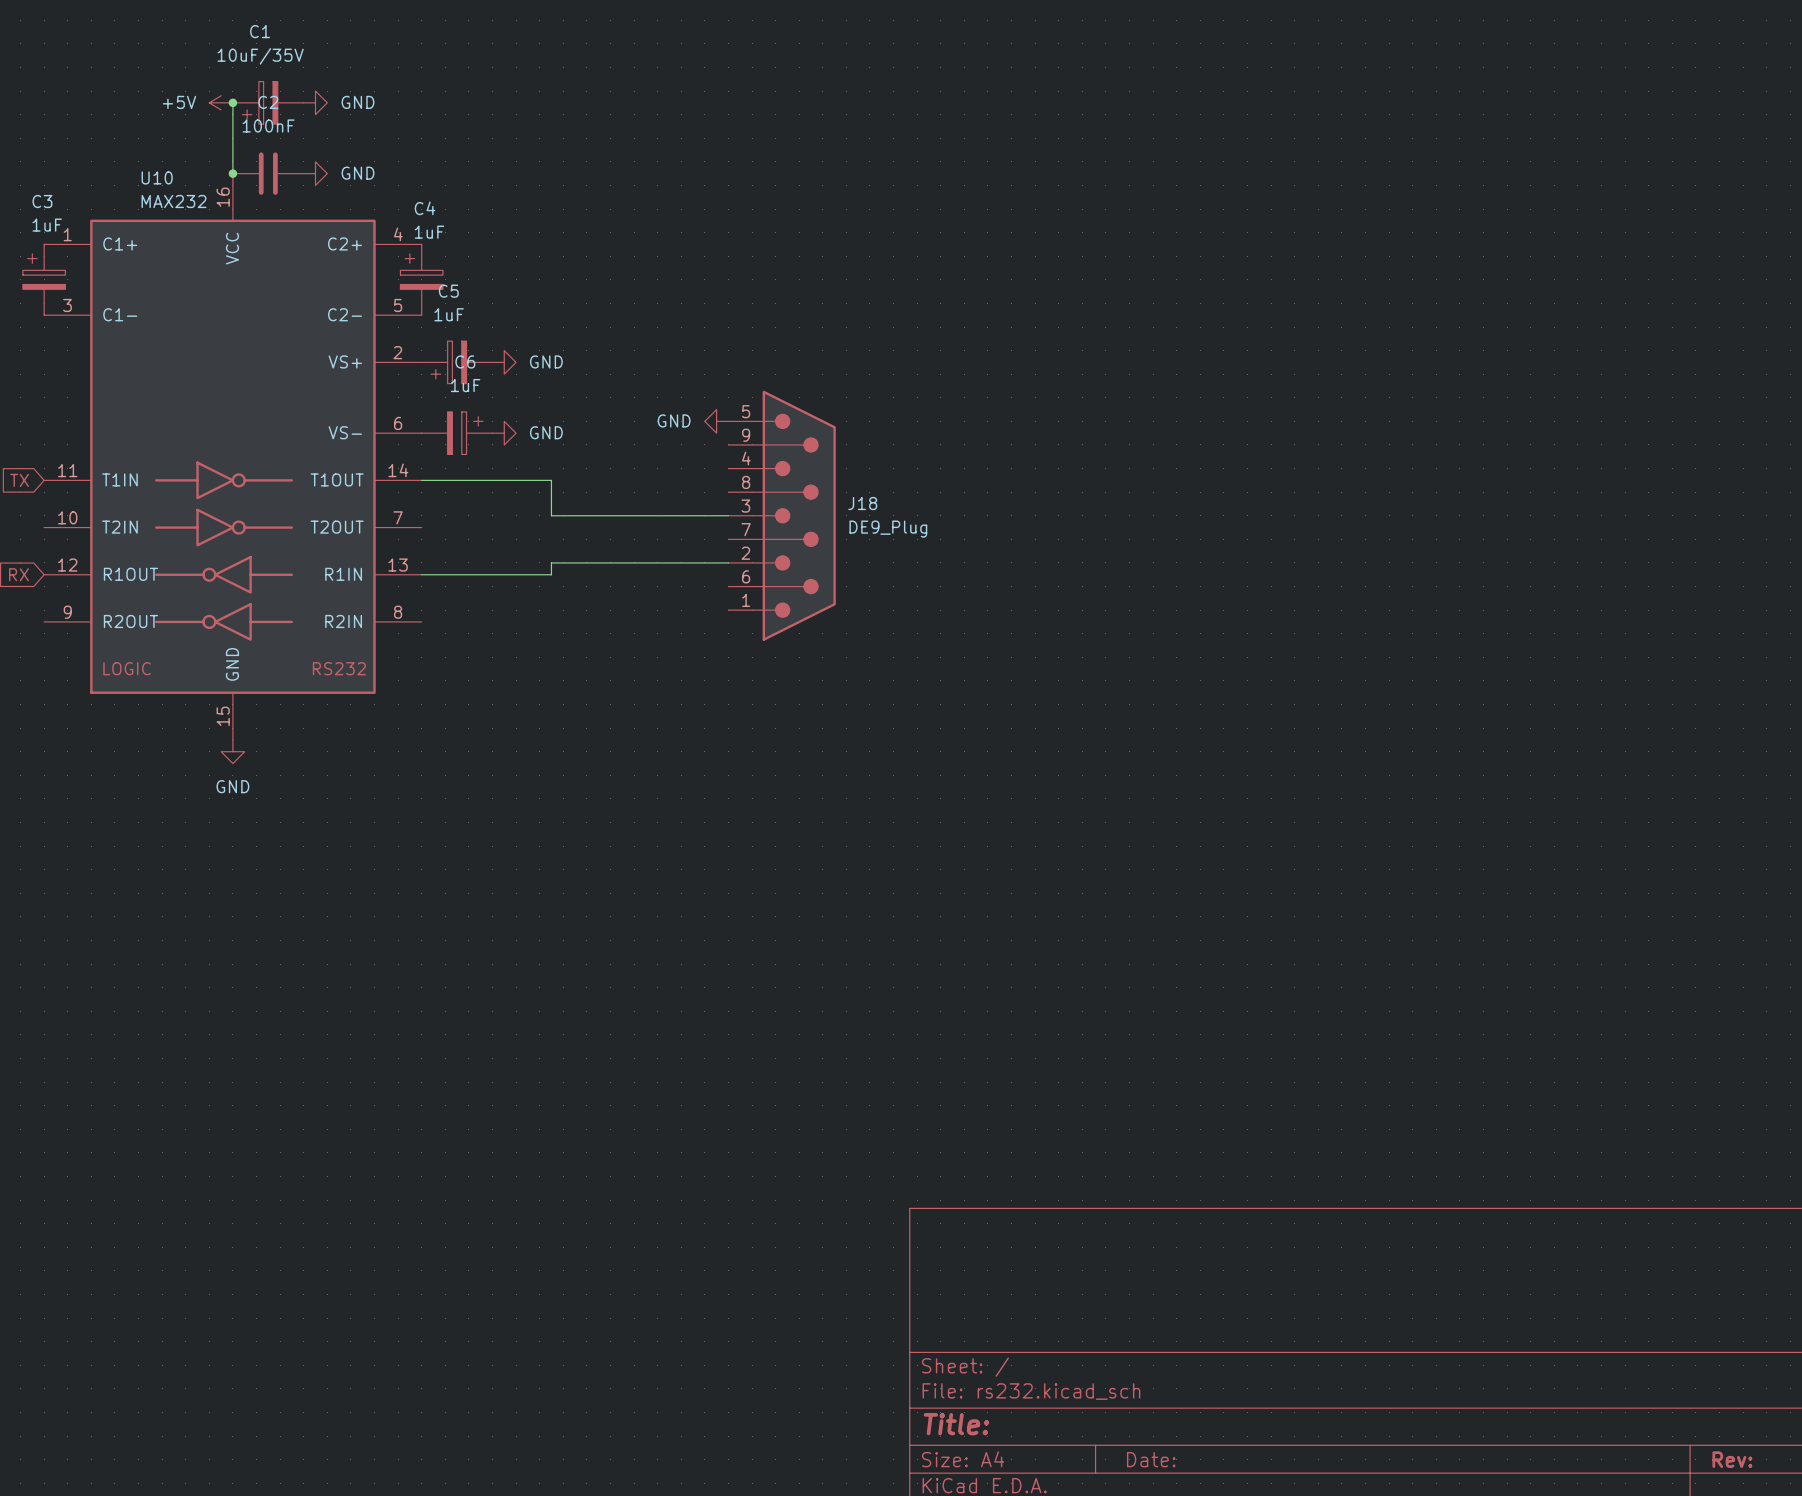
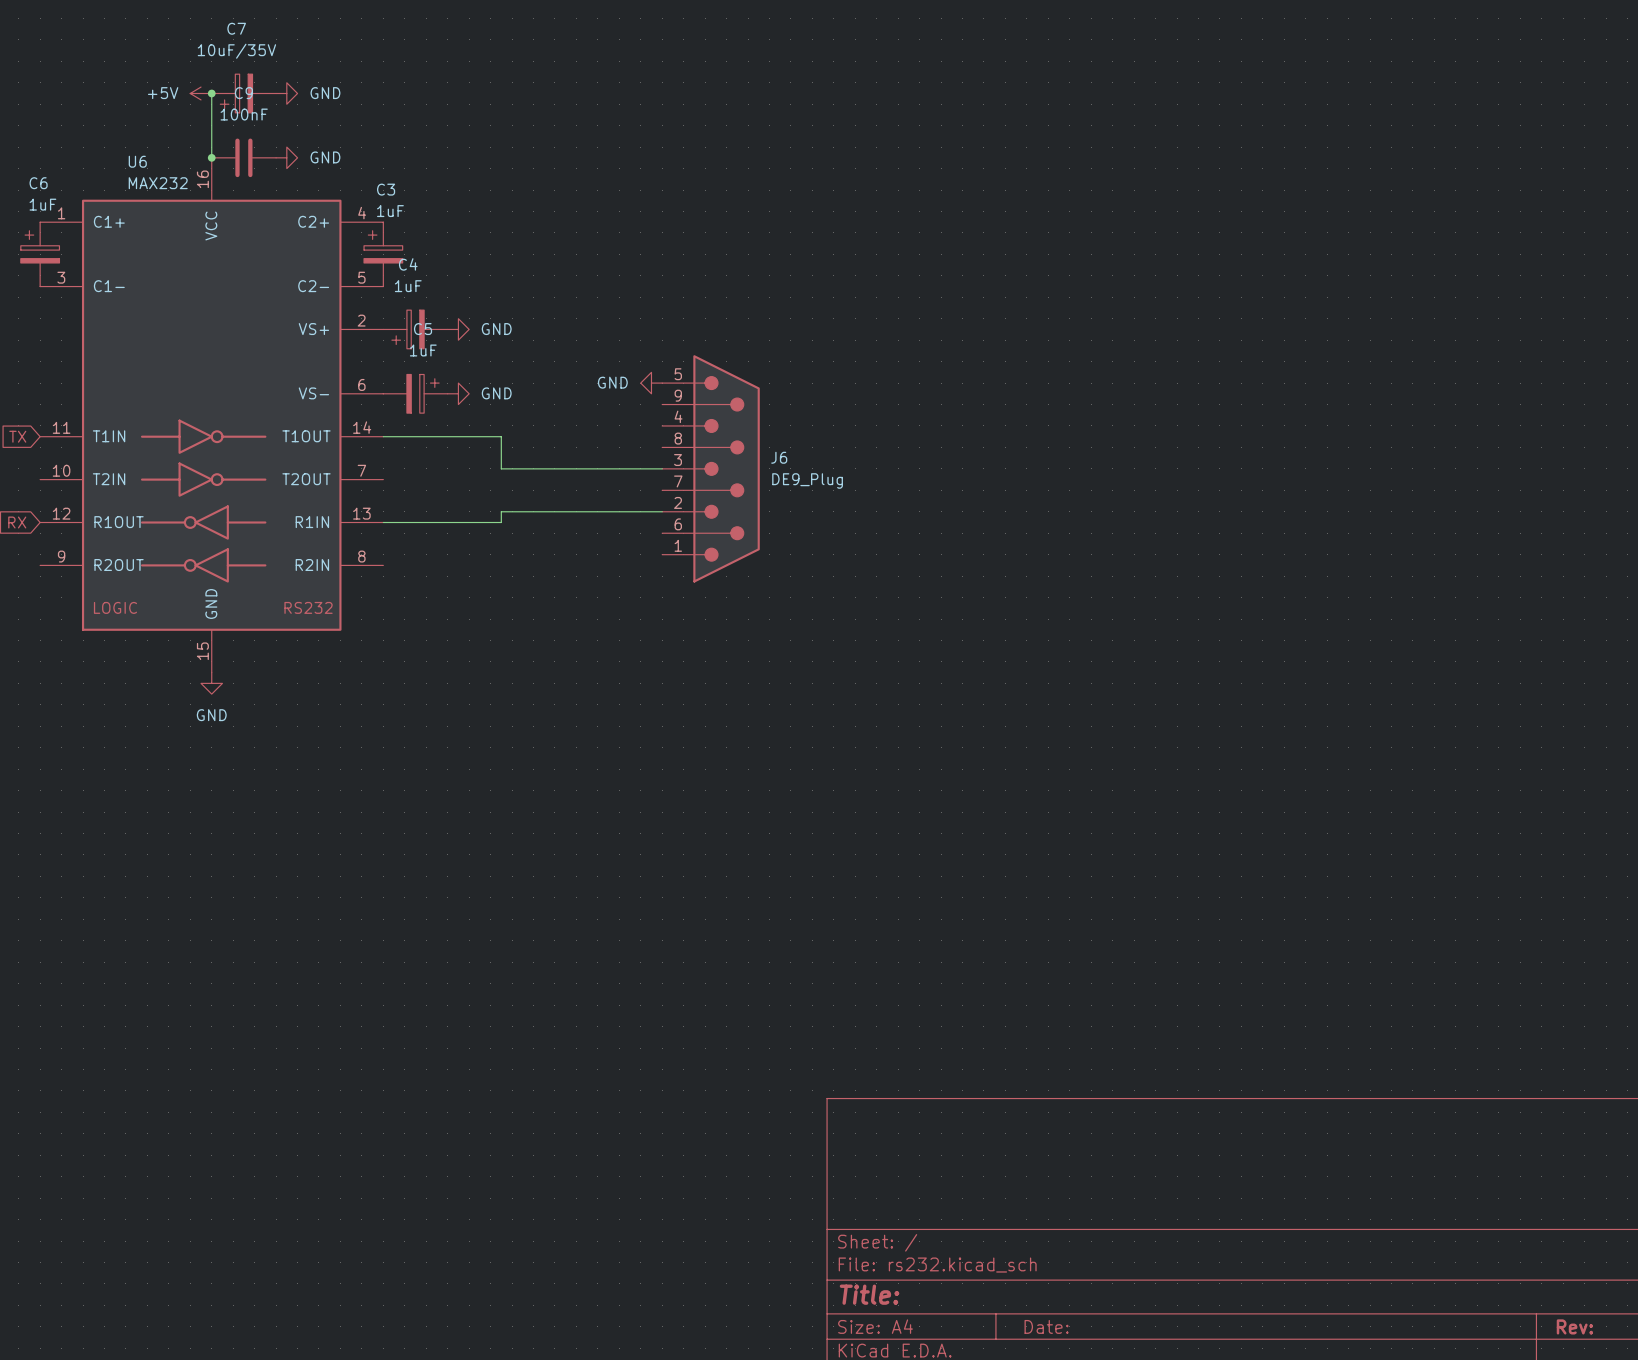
C1 name: C1 (260, 31) -> C7 (236, 28)
C2 name: C2 (268, 102) -> C9 (243, 93)
U10 name: U10 (157, 177) -> U6 (137, 161)
C3 name: C3 (42, 201) -> C6 (38, 183)
C4 name: C4 (424, 208) -> C3 (386, 189)
C5 name: C5 (448, 291) -> C4 (408, 264)
C6 name: C6 (465, 361) -> C5 (423, 329)
J18 name: J18 (862, 503) -> J6 (779, 457)

